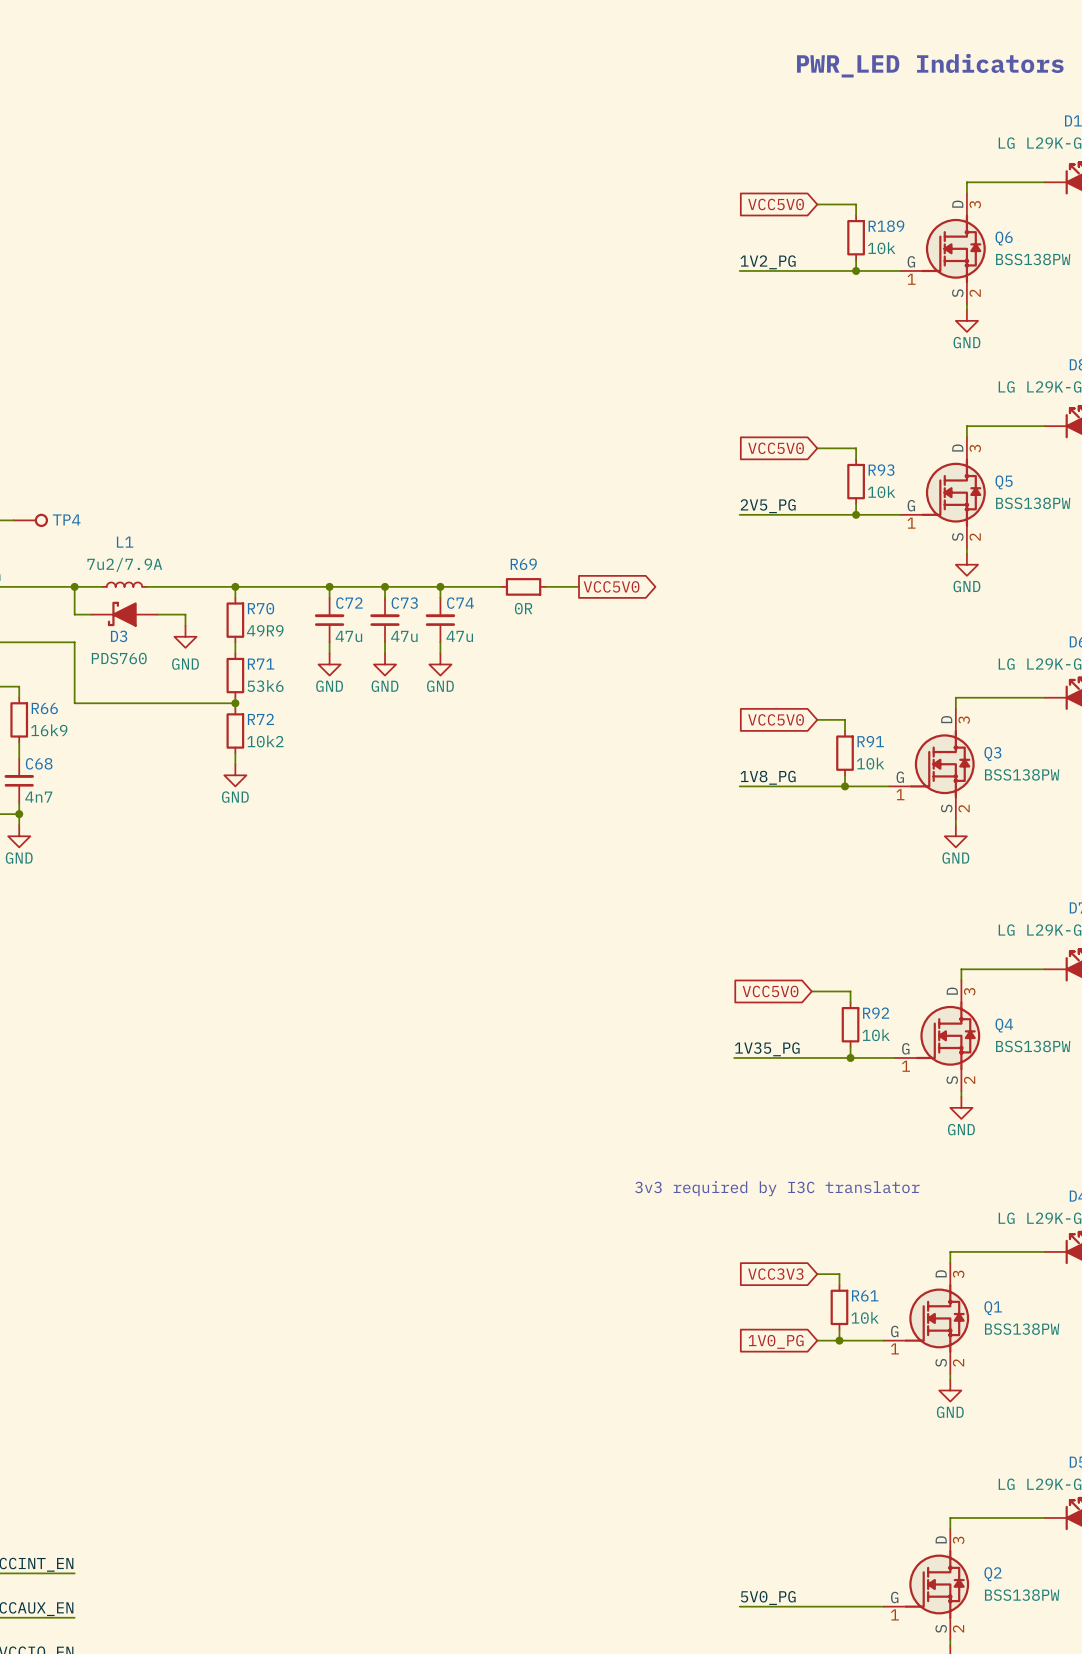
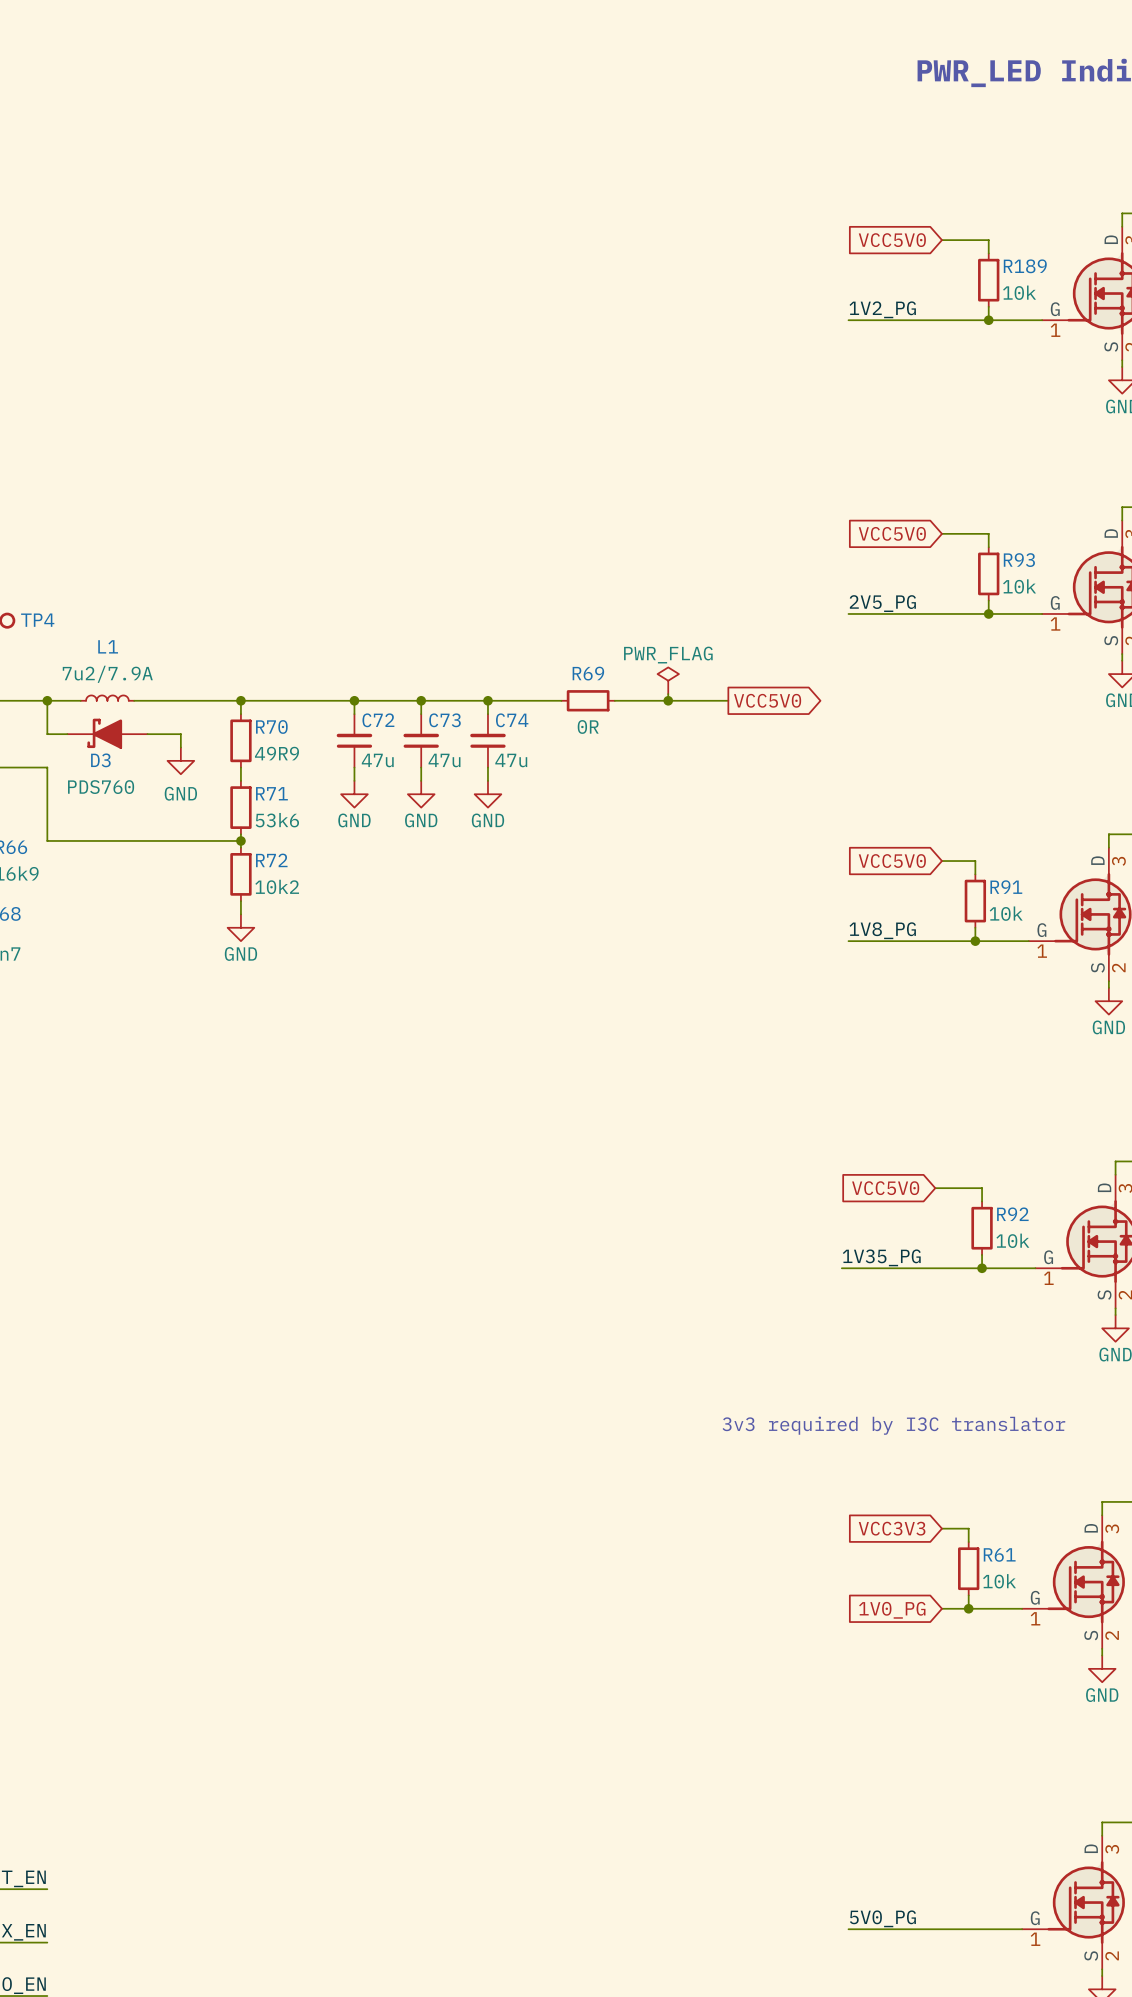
power symbol: none -> PWR_FLAG (668, 680)
wire: none -> (654, 700) (728, 700)
junction: none -> (668, 700)
global label position: VCC5V0 (611, 586) -> VCC5V0 (767, 700)

